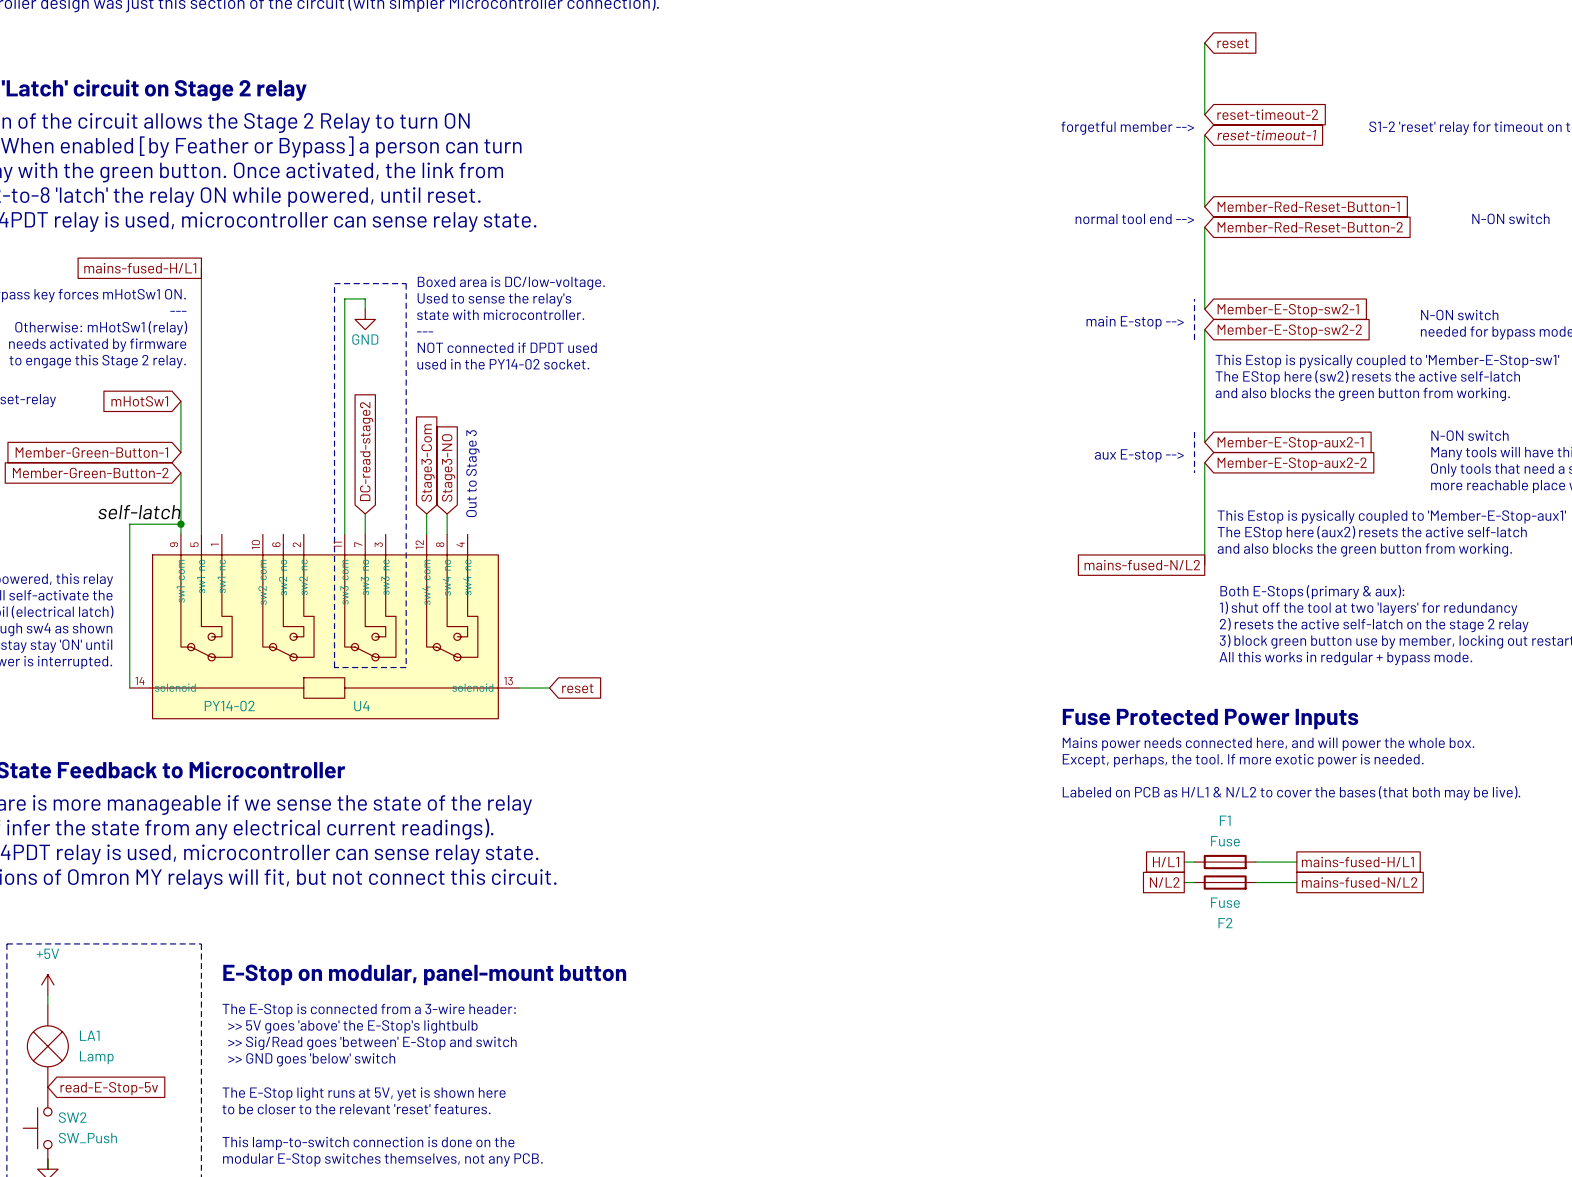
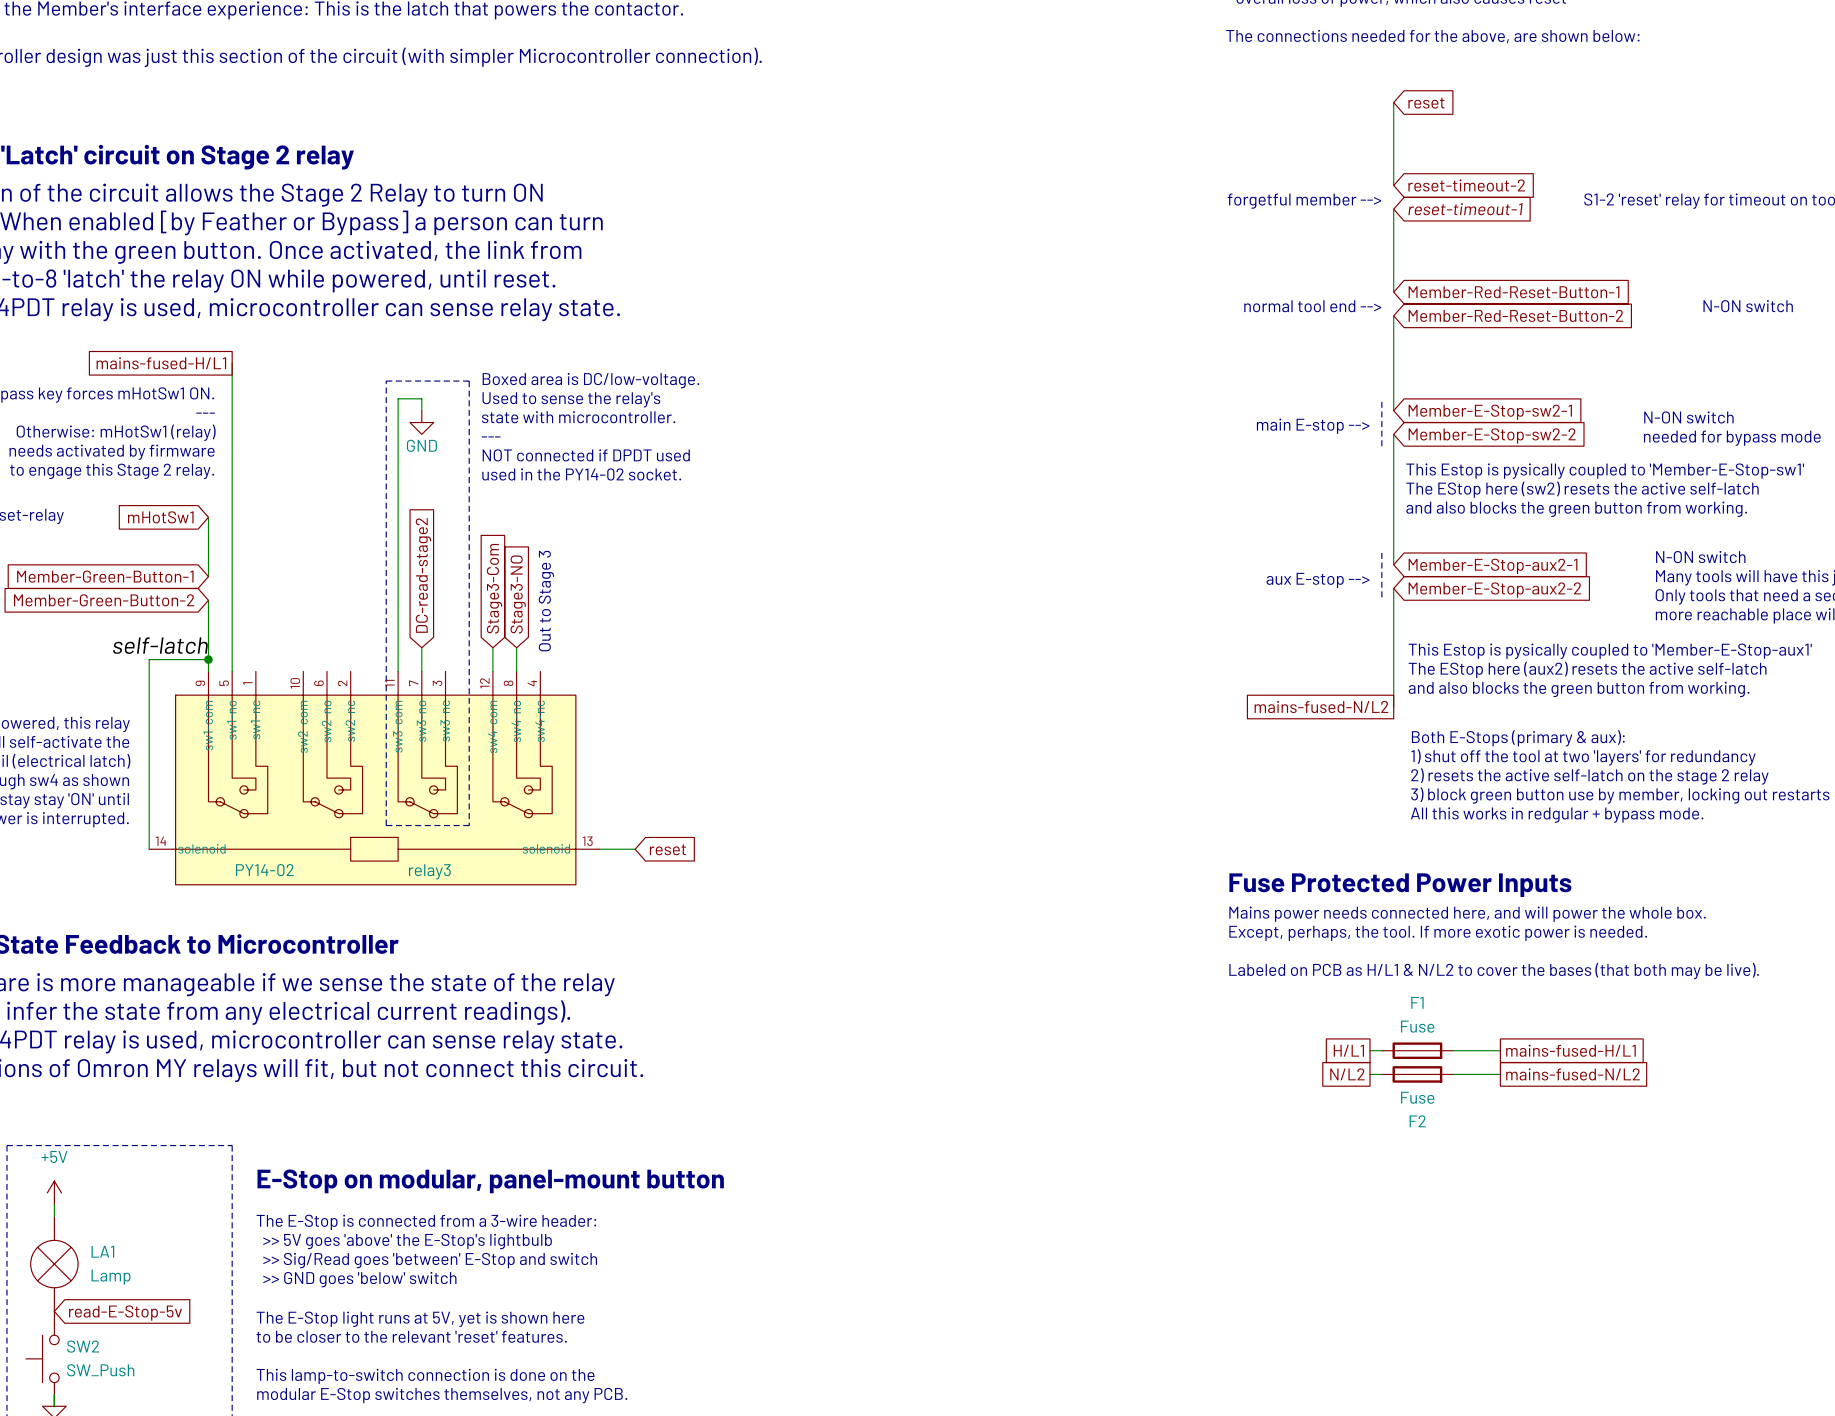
U4 name: U4 (361, 706) -> relay3 (429, 871)

